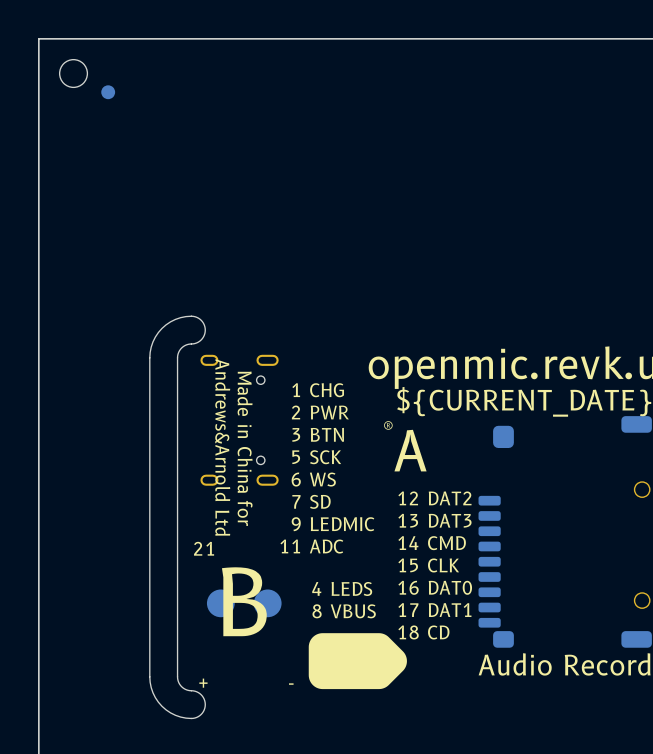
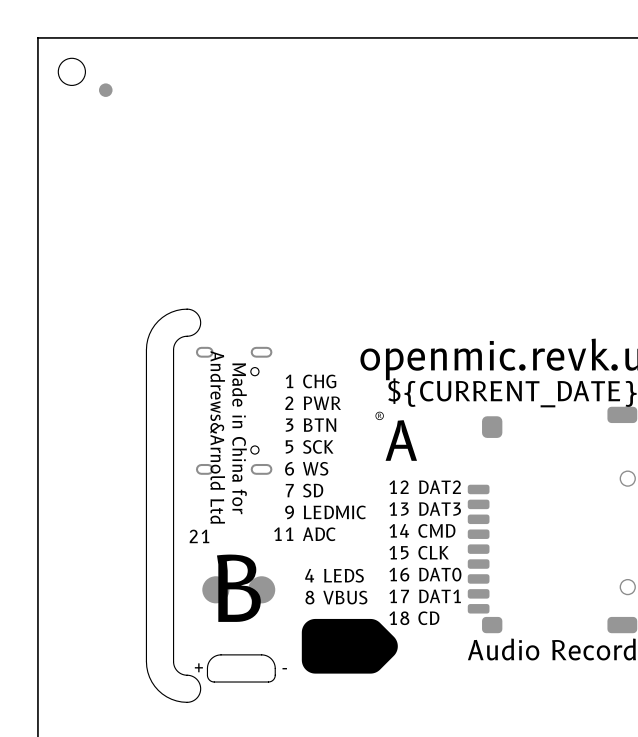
board edge: none -> (261, 654) (215, 656) (208, 663) (207, 677) (214, 682) (271, 681) (275, 676) (274, 663) (268, 656) (261, 654)

